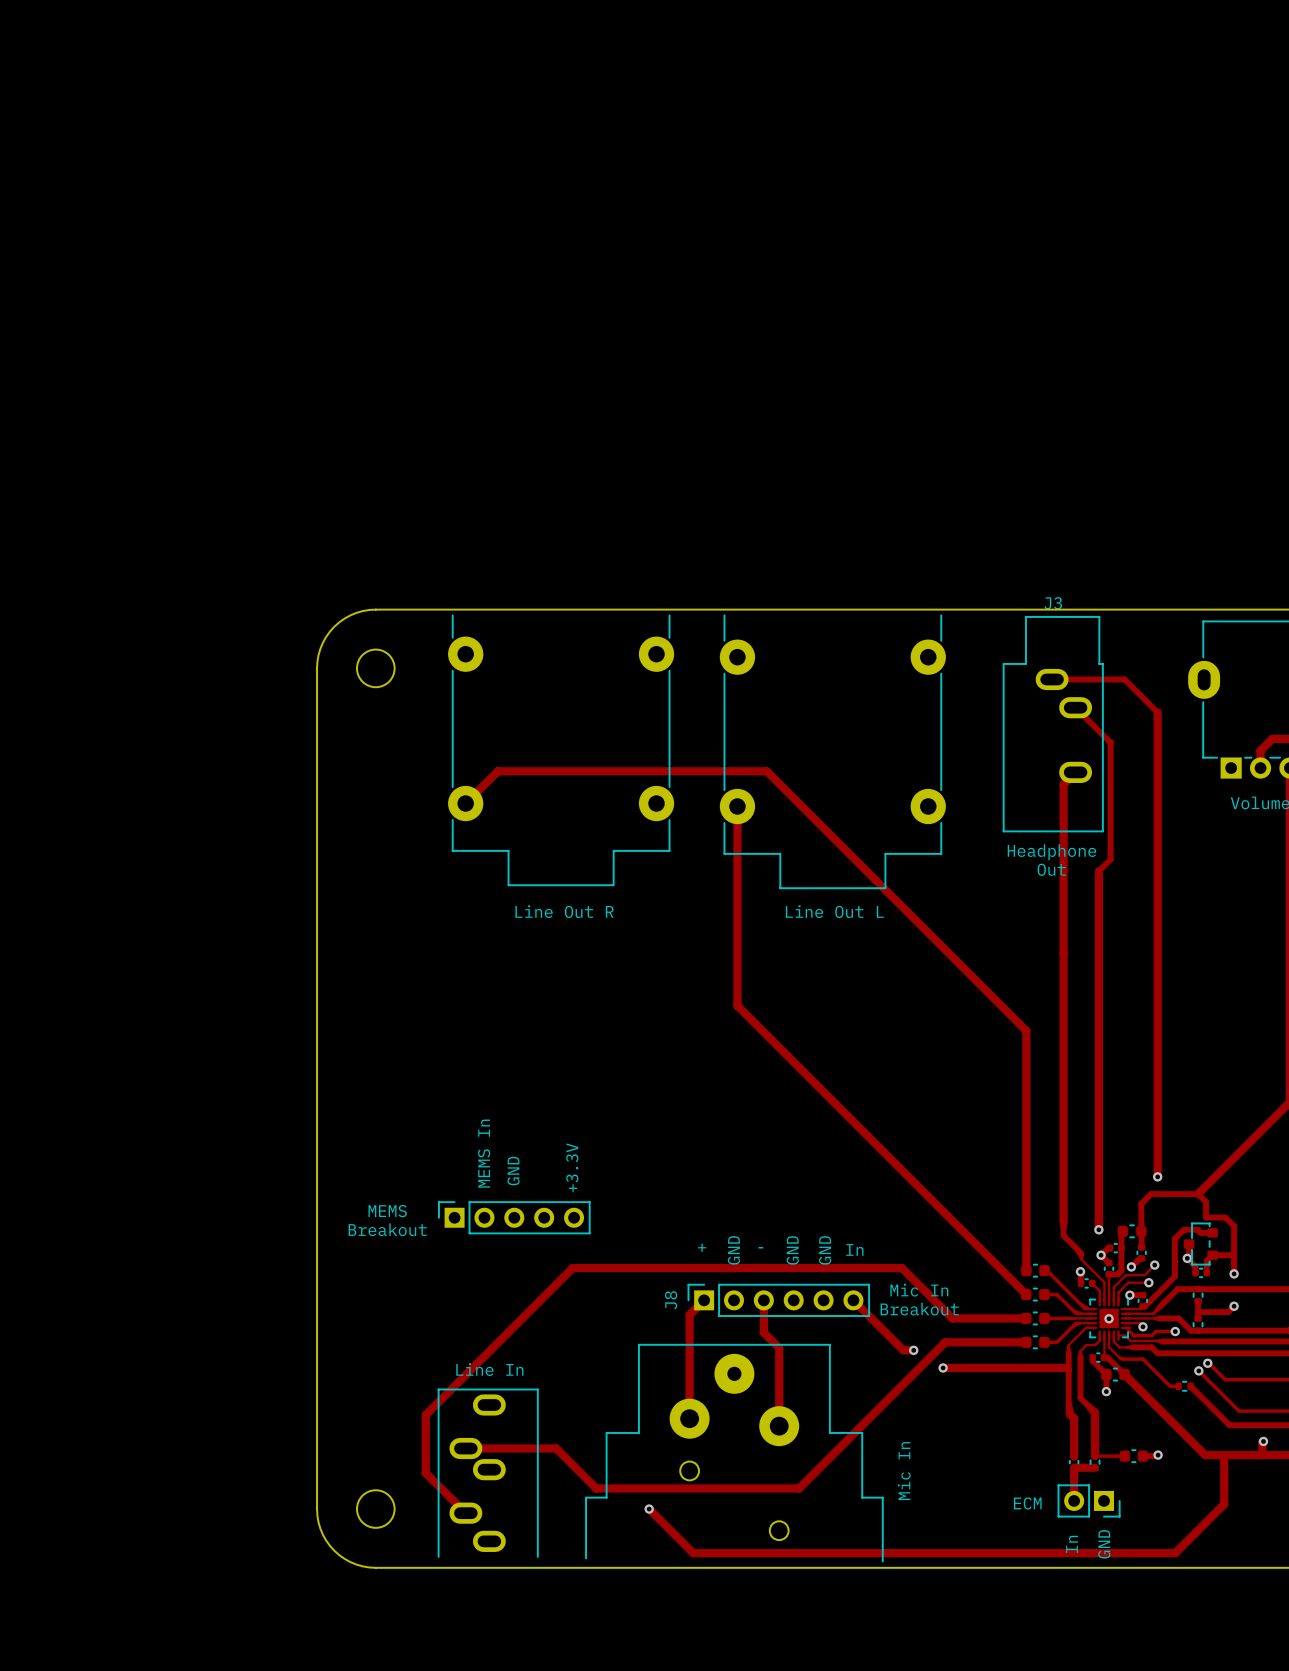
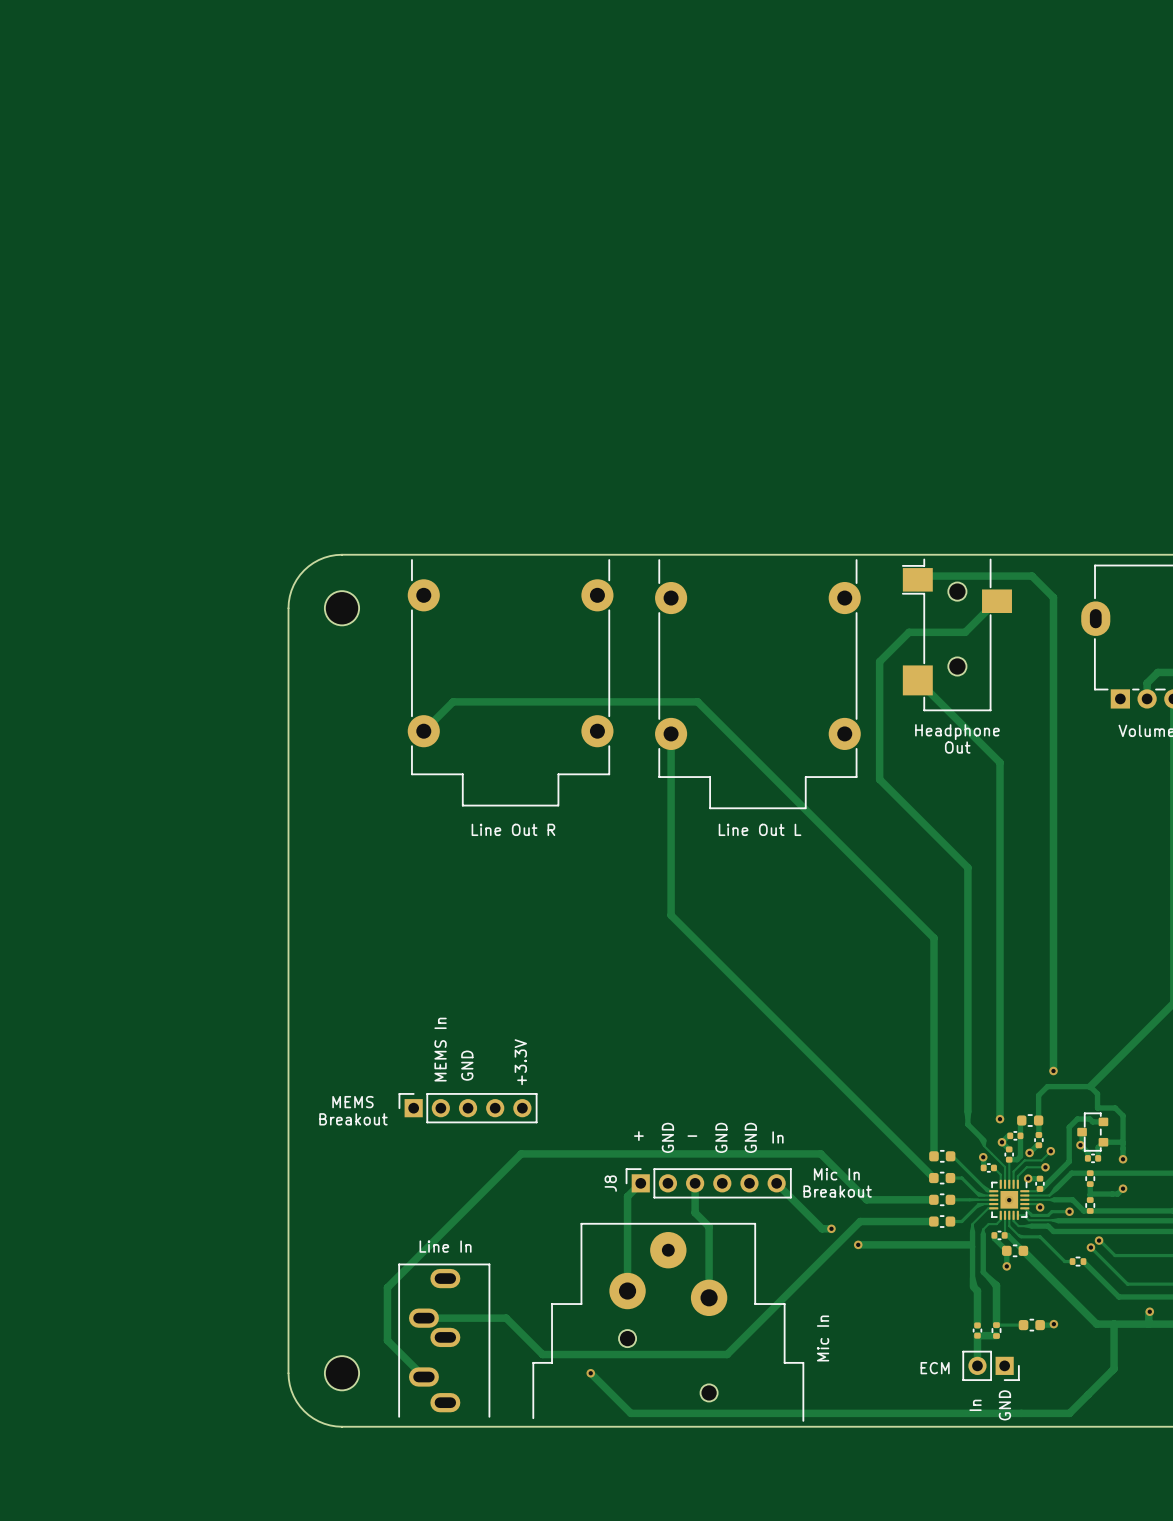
track: (1052, 679) (1124, 679) (1157, 712) -> (917, 587) (917, 579) (921, 576) (1032, 576) (1053, 597) (1053, 648)
part: none -> (957, 634)
track: (1075, 707) (1110, 741) (1110, 859) (1098, 871) -> (917, 680) (1000, 762) (1000, 792)
J3: (1053, 724) -> none
track: (1075, 772) (1063, 784) (1063, 953) -> (997, 601) (965, 632) (909, 632) (879, 661) (879, 779) (967, 867)
text position: Headphone (1051, 852) -> Headphone (957, 732)
text position: Out (1051, 869) -> Out (957, 747)

